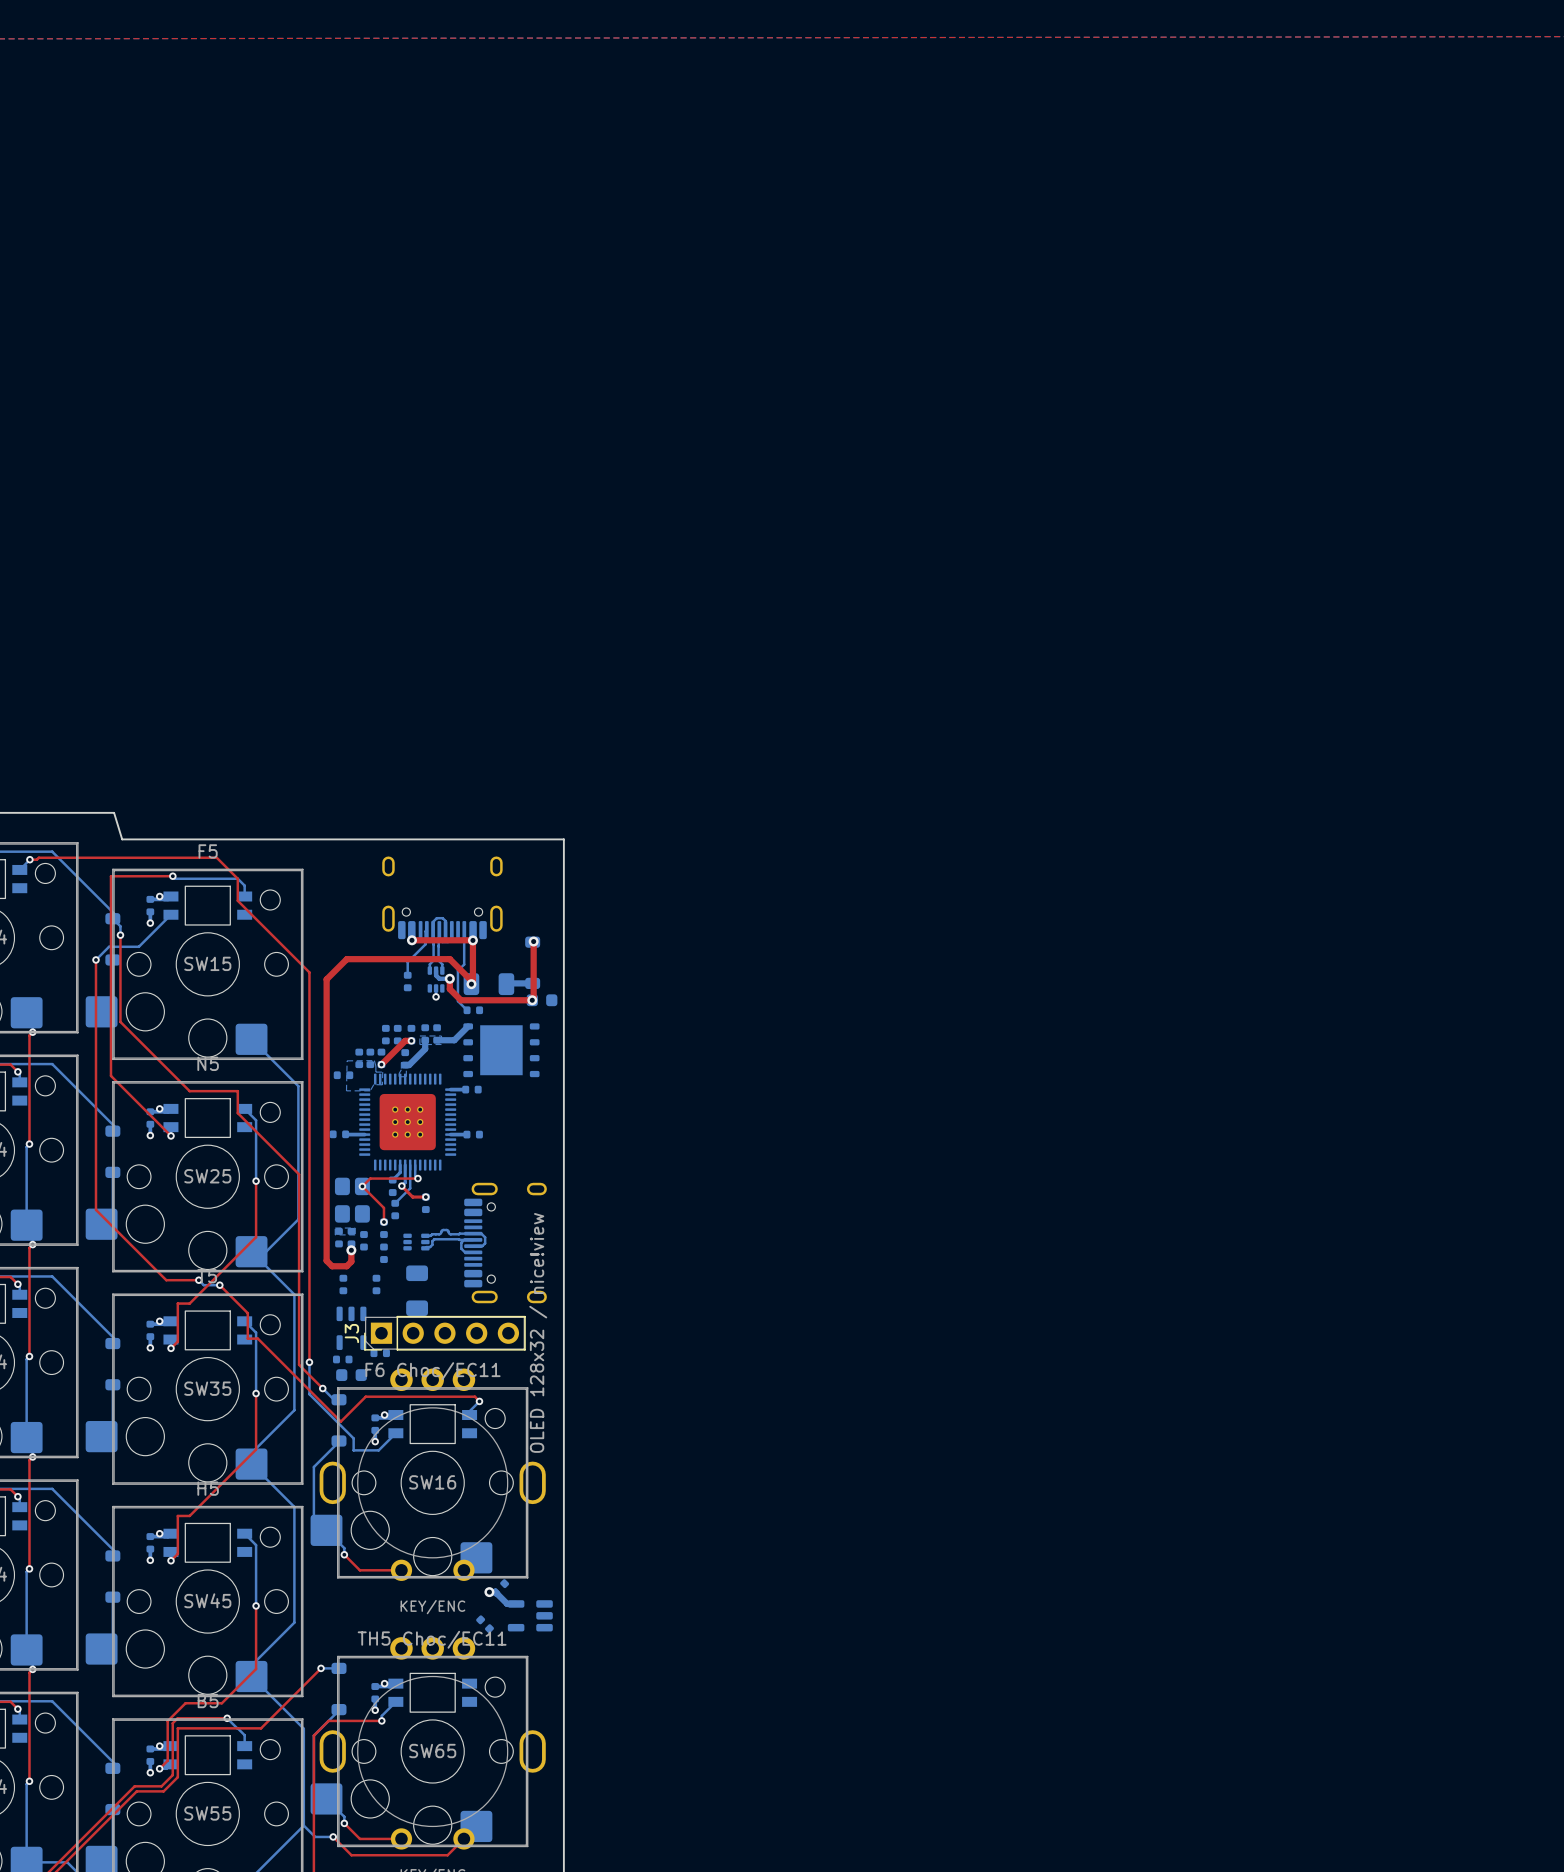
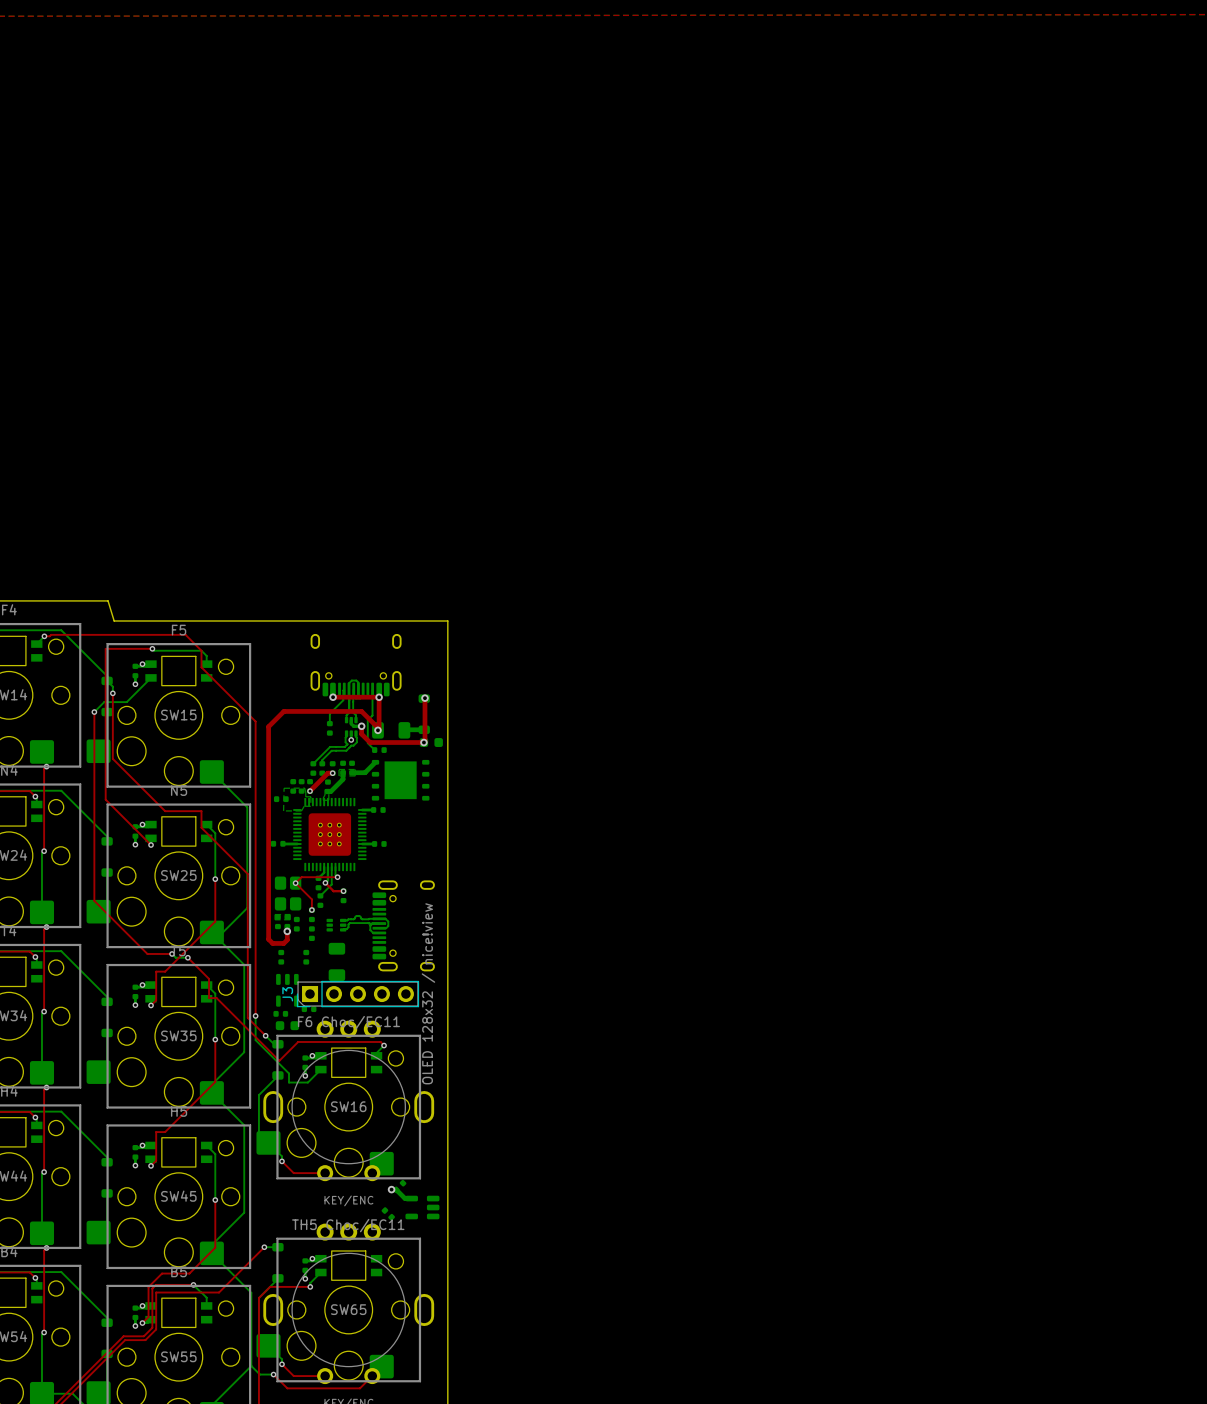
bottom track: none -> (346, 733) (345, 742) (347, 744) (344, 746) (330, 746) (313, 763)
bottom track: none -> (355, 733) (356, 742) (353, 745) (346, 750) (331, 750) (322, 760) (322, 763)

